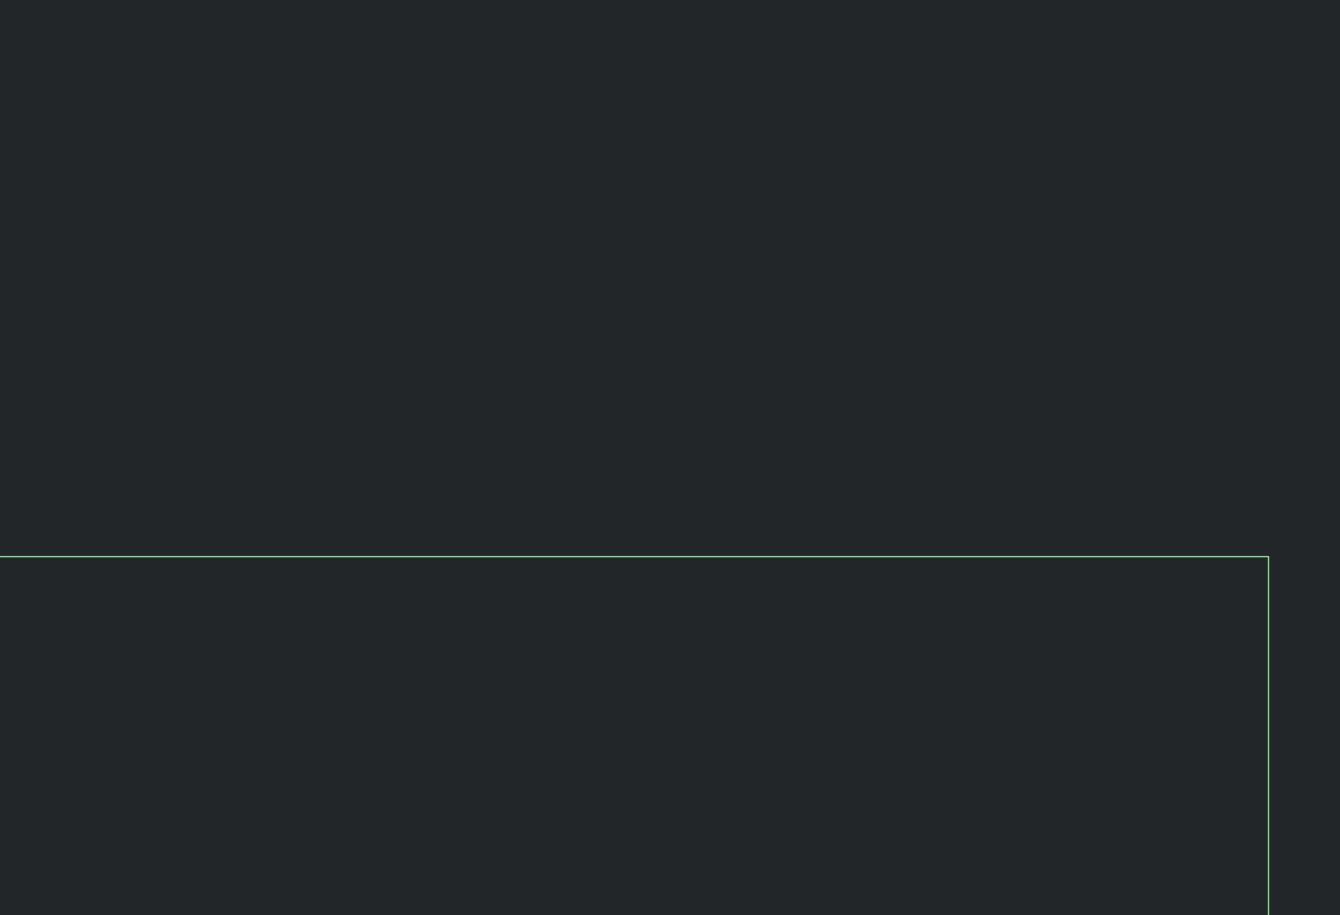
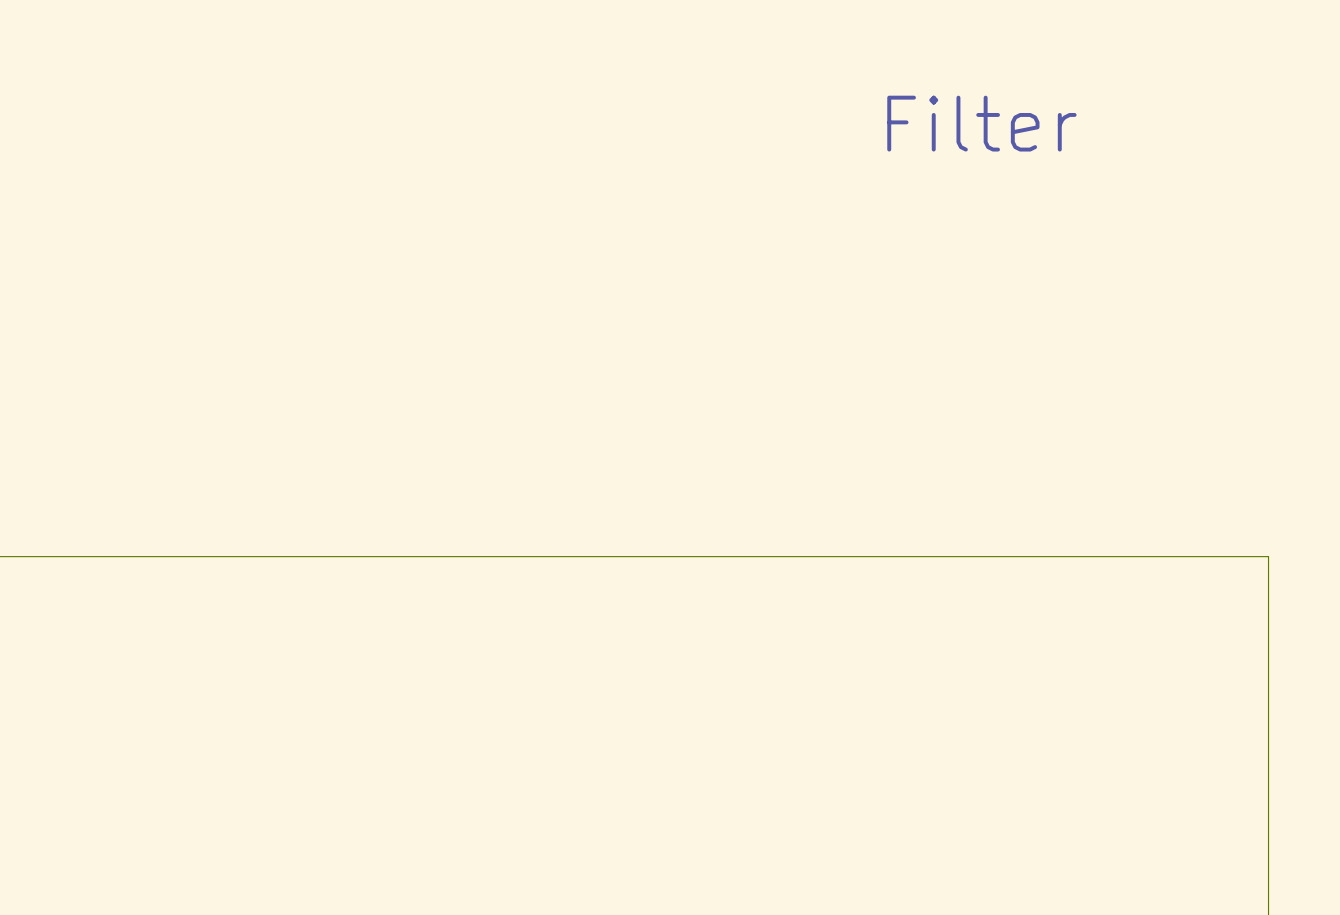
text: none -> Filter (981, 123)

